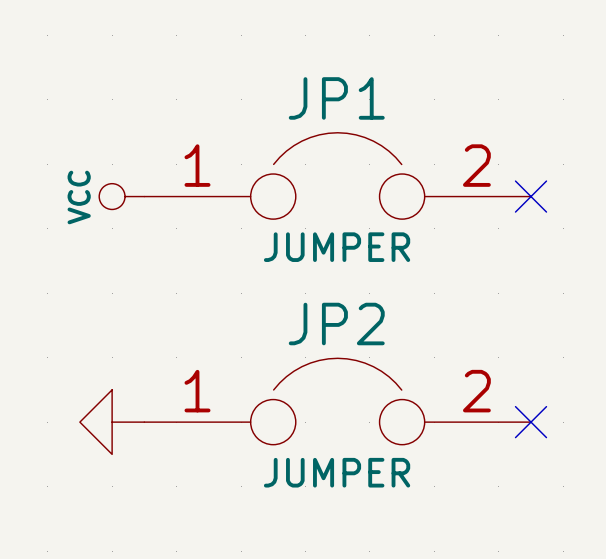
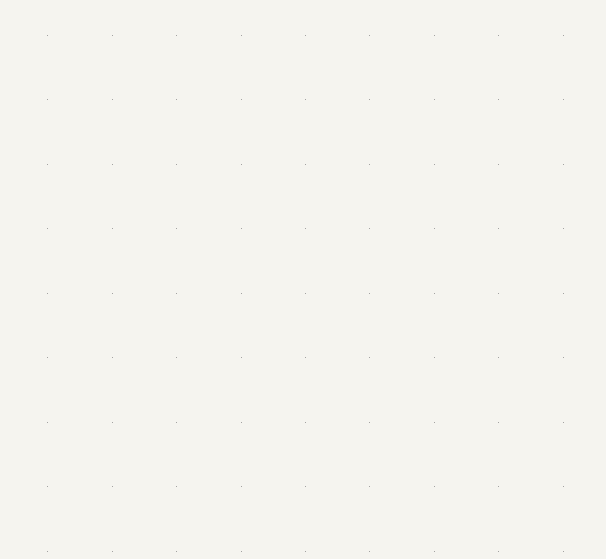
JP1: JUMPER (337, 175) -> none
power symbol: VCC (121, 196) -> none
no-connect mark: (531, 196) -> none
JP2: JUMPER (337, 401) -> none
power symbol: (112, 422) -> none
no-connect mark: (531, 422) -> none

